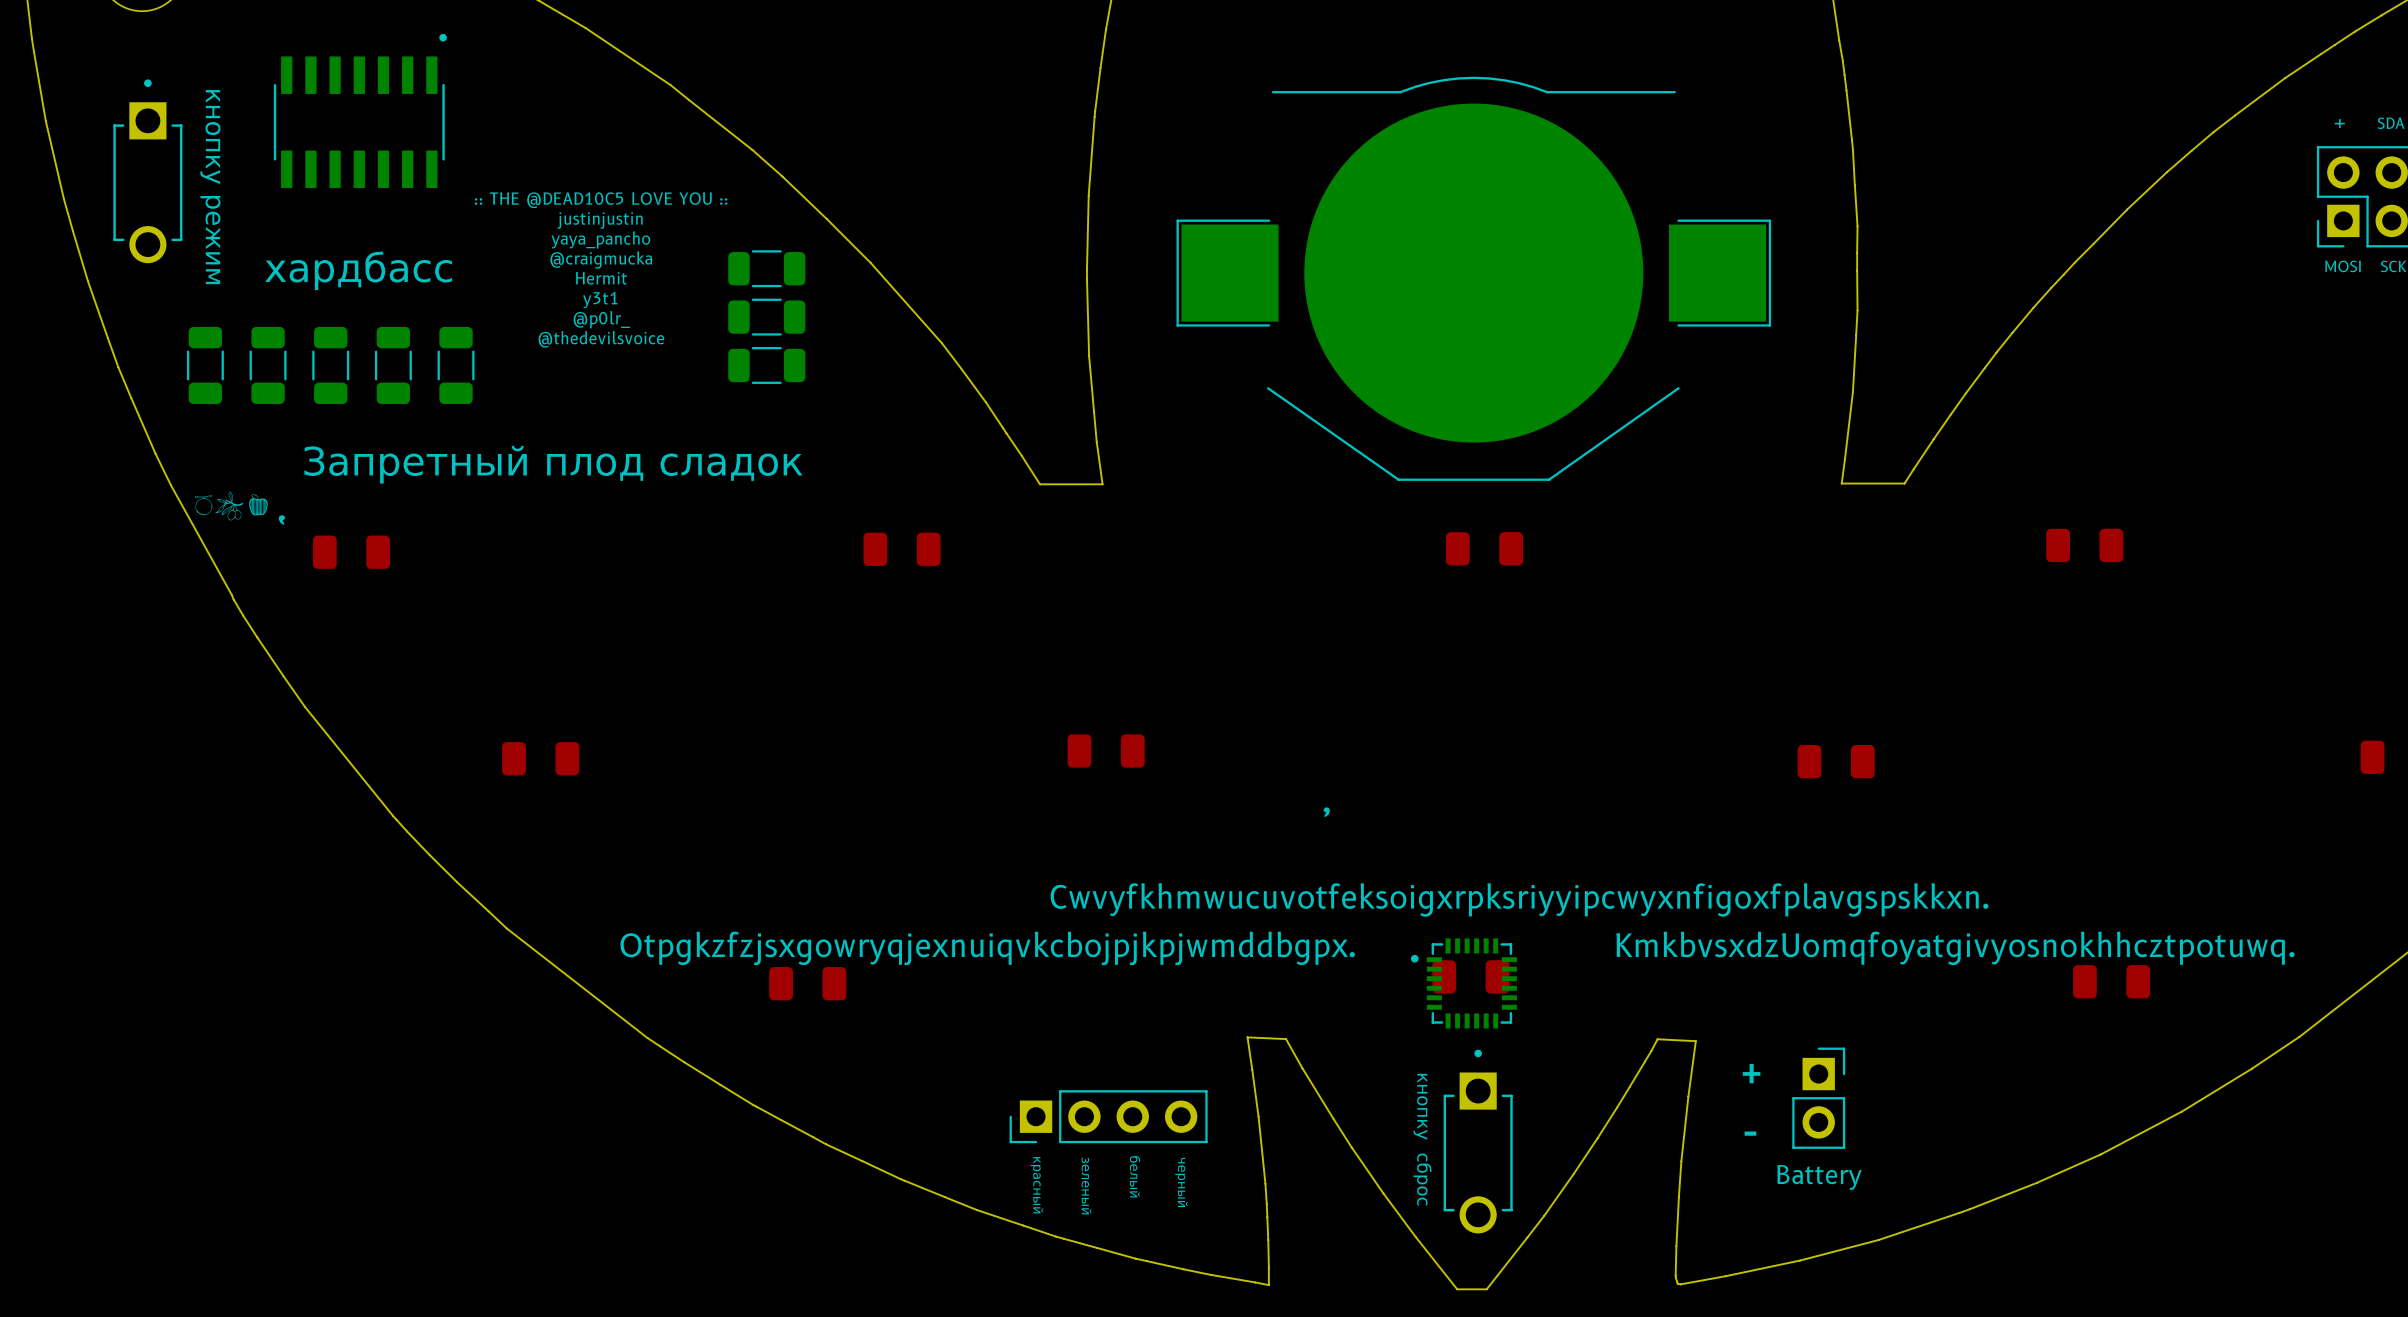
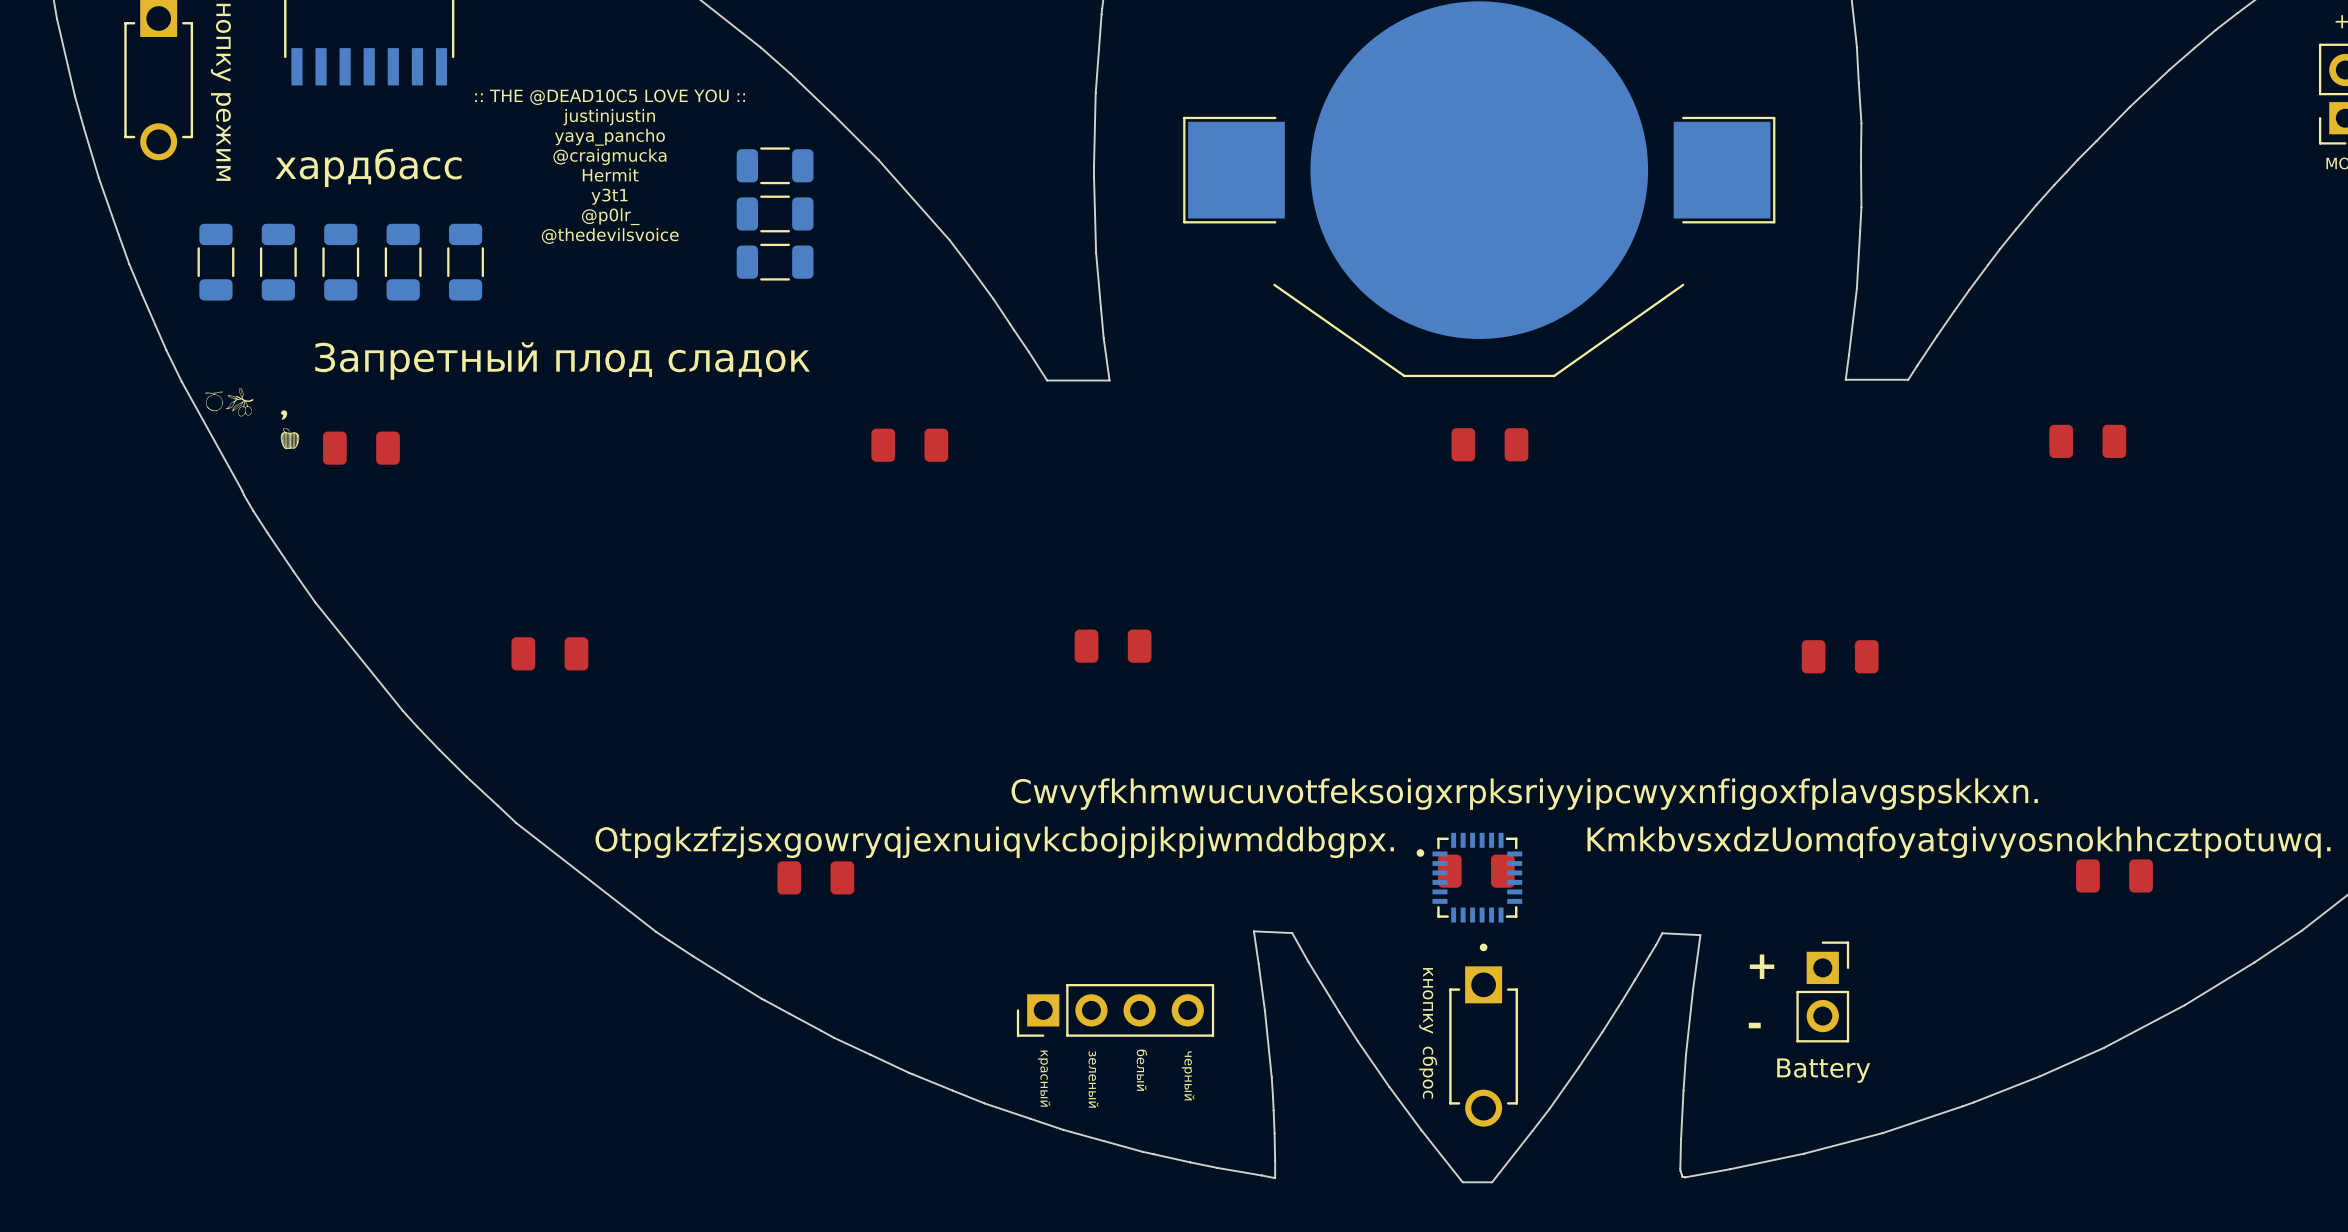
drawing position: (258, 504) -> (289, 438)
drawing: none -> [280, 410, 288, 420]
drawing: [278, 515, 286, 525] -> none
drawing: [1323, 807, 1330, 817] -> none

